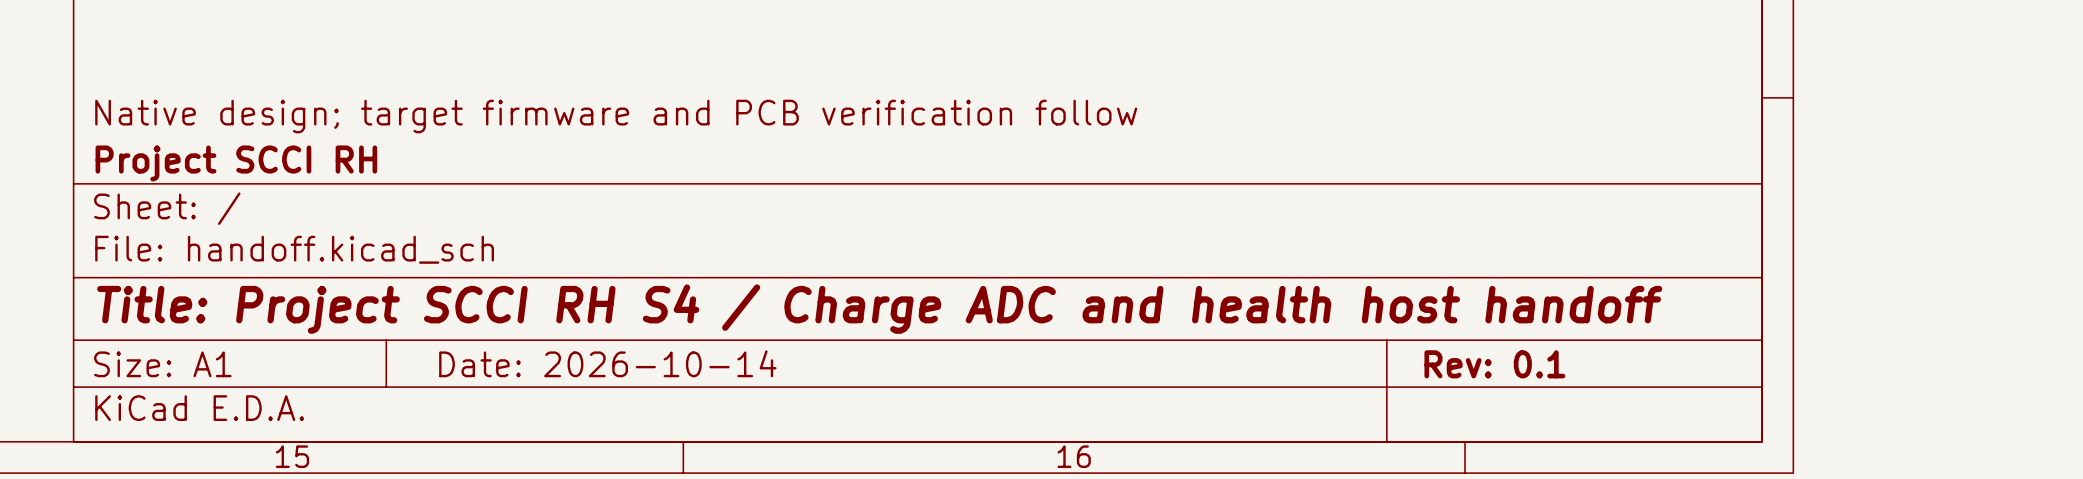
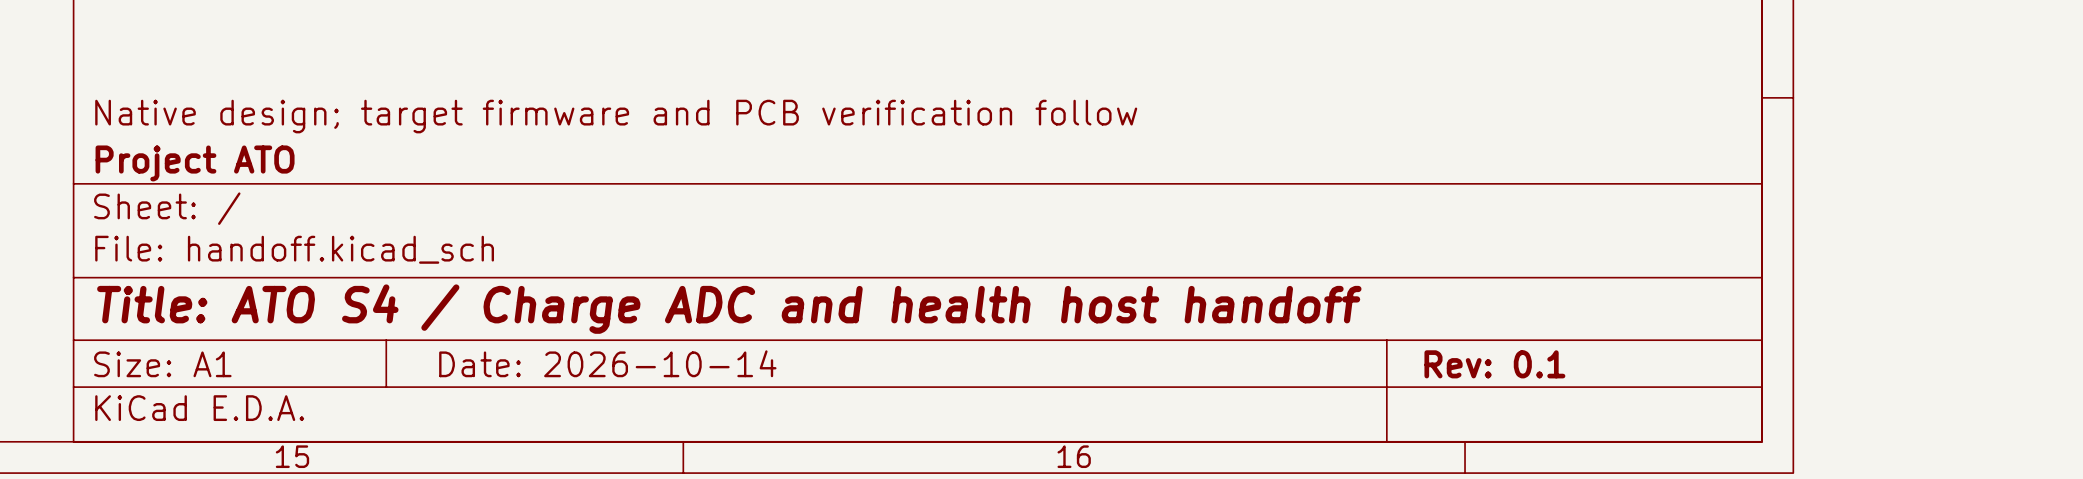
title block: Project SCCI RH (236, 163) -> Project ATO (195, 163)
title block: Title: Project SCCI RH S4 / Charge ADC and health host handoff (879, 309) -> Title: ATO S4 / Charge ADC and health host handoff (729, 309)

